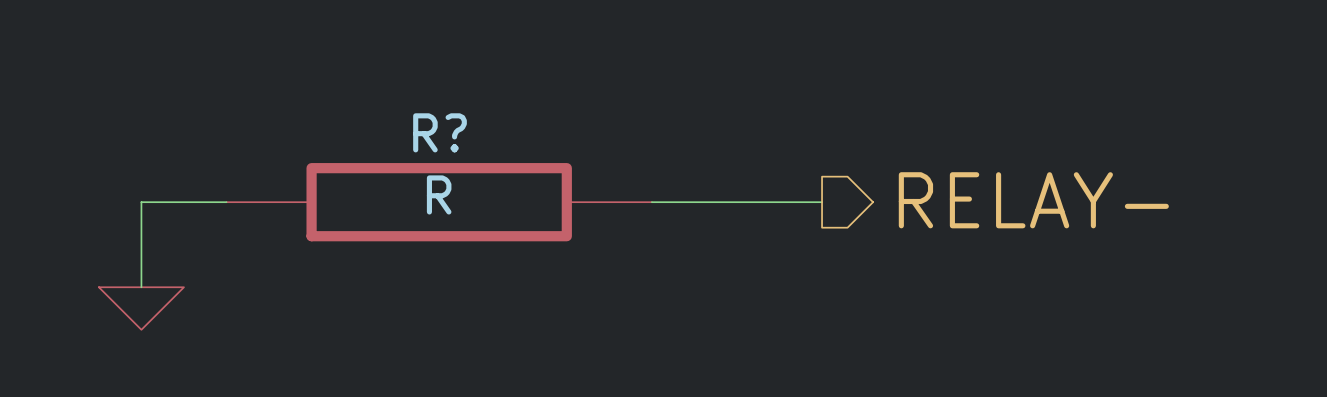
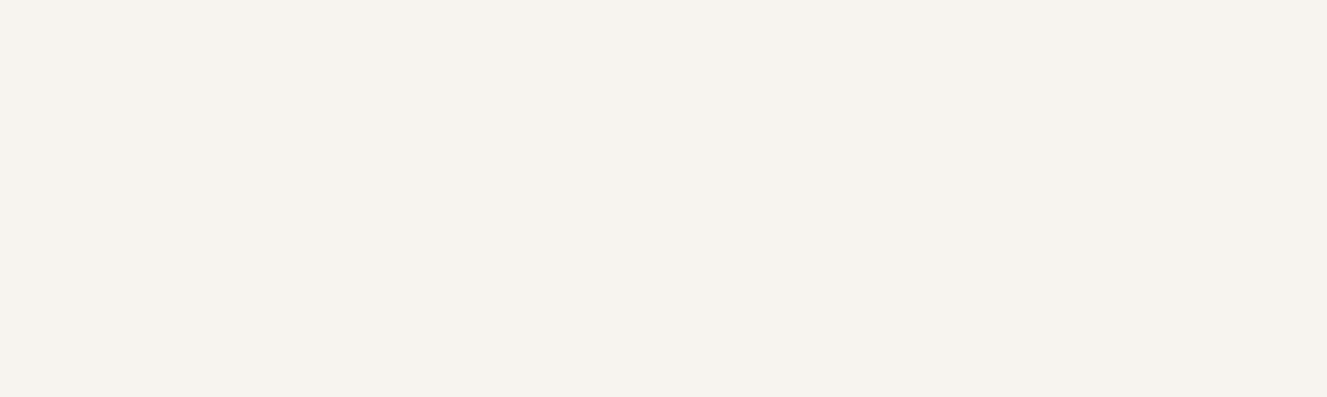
hierarchical label: RELAY- (1033, 200) -> none
wire: (226, 202) (141, 202) (141, 287) -> none
R?: R (439, 202) -> none
wire: (651, 202) (822, 202) -> none
power symbol: (141, 308) -> none

